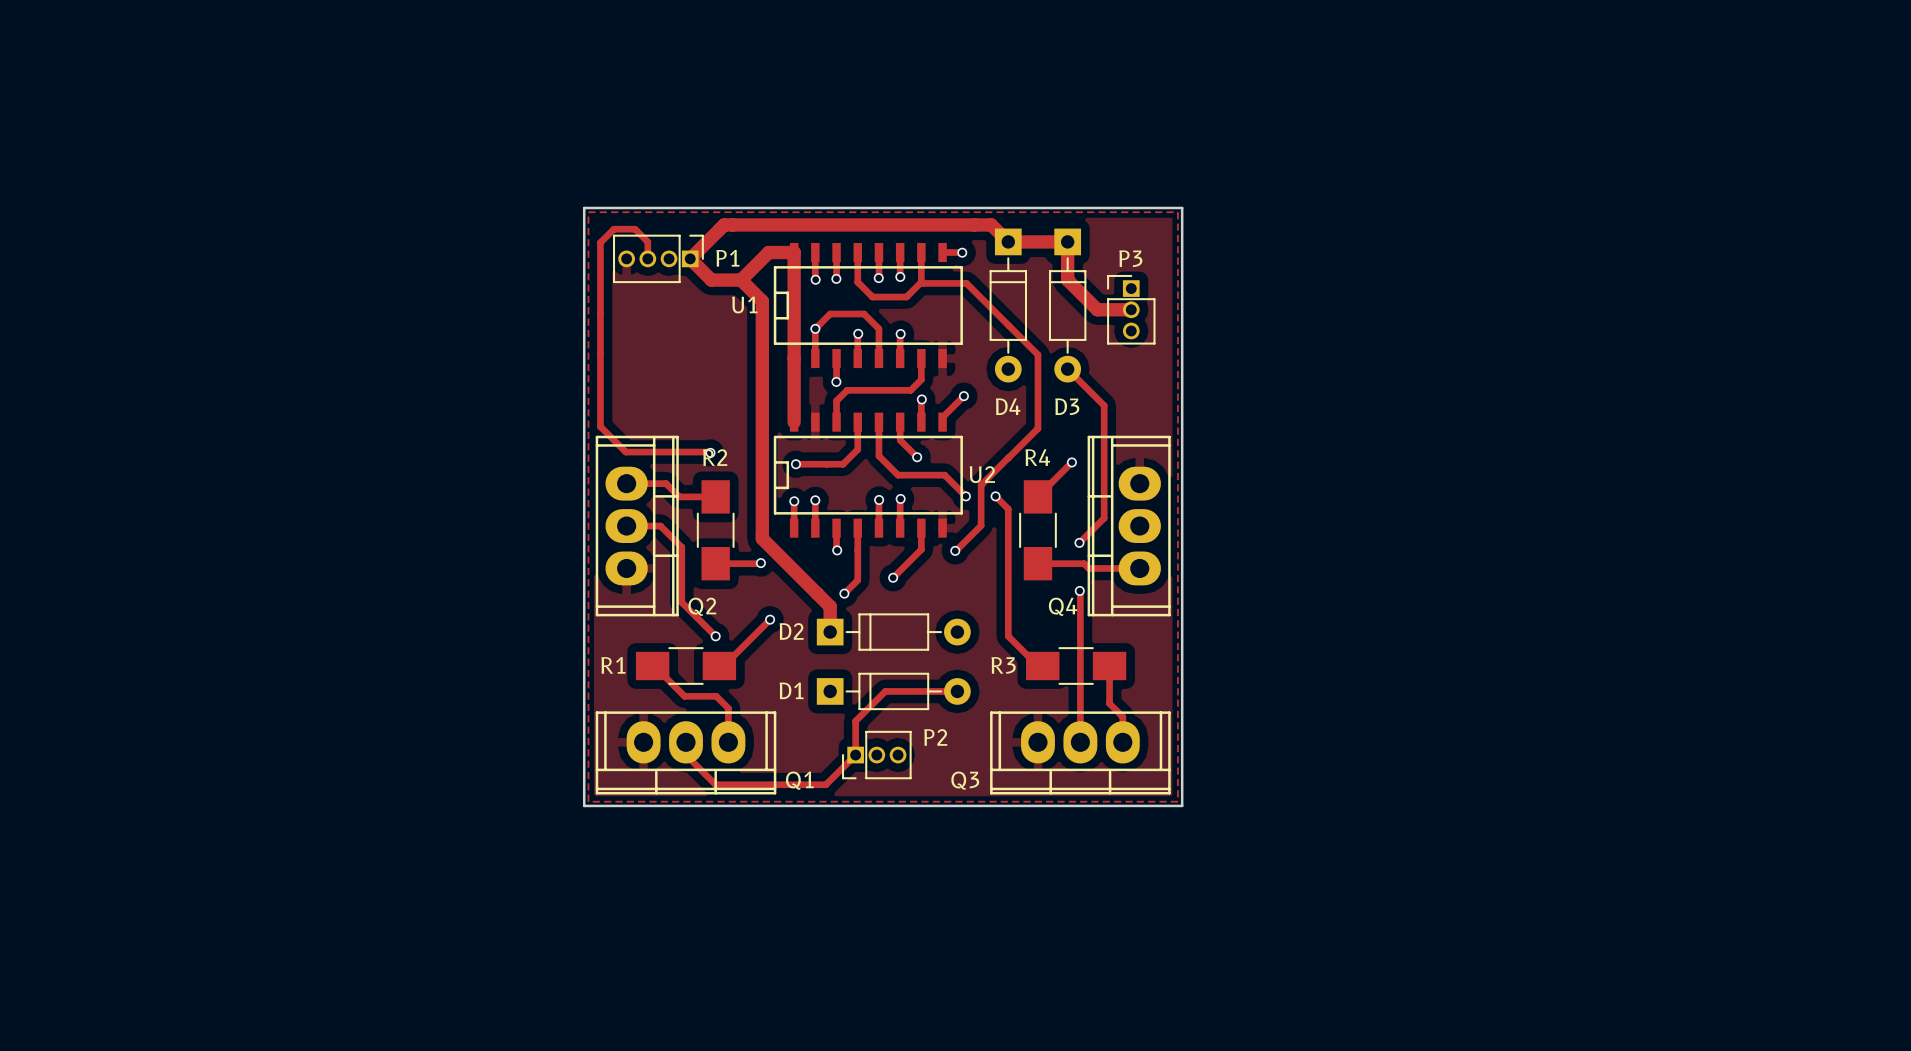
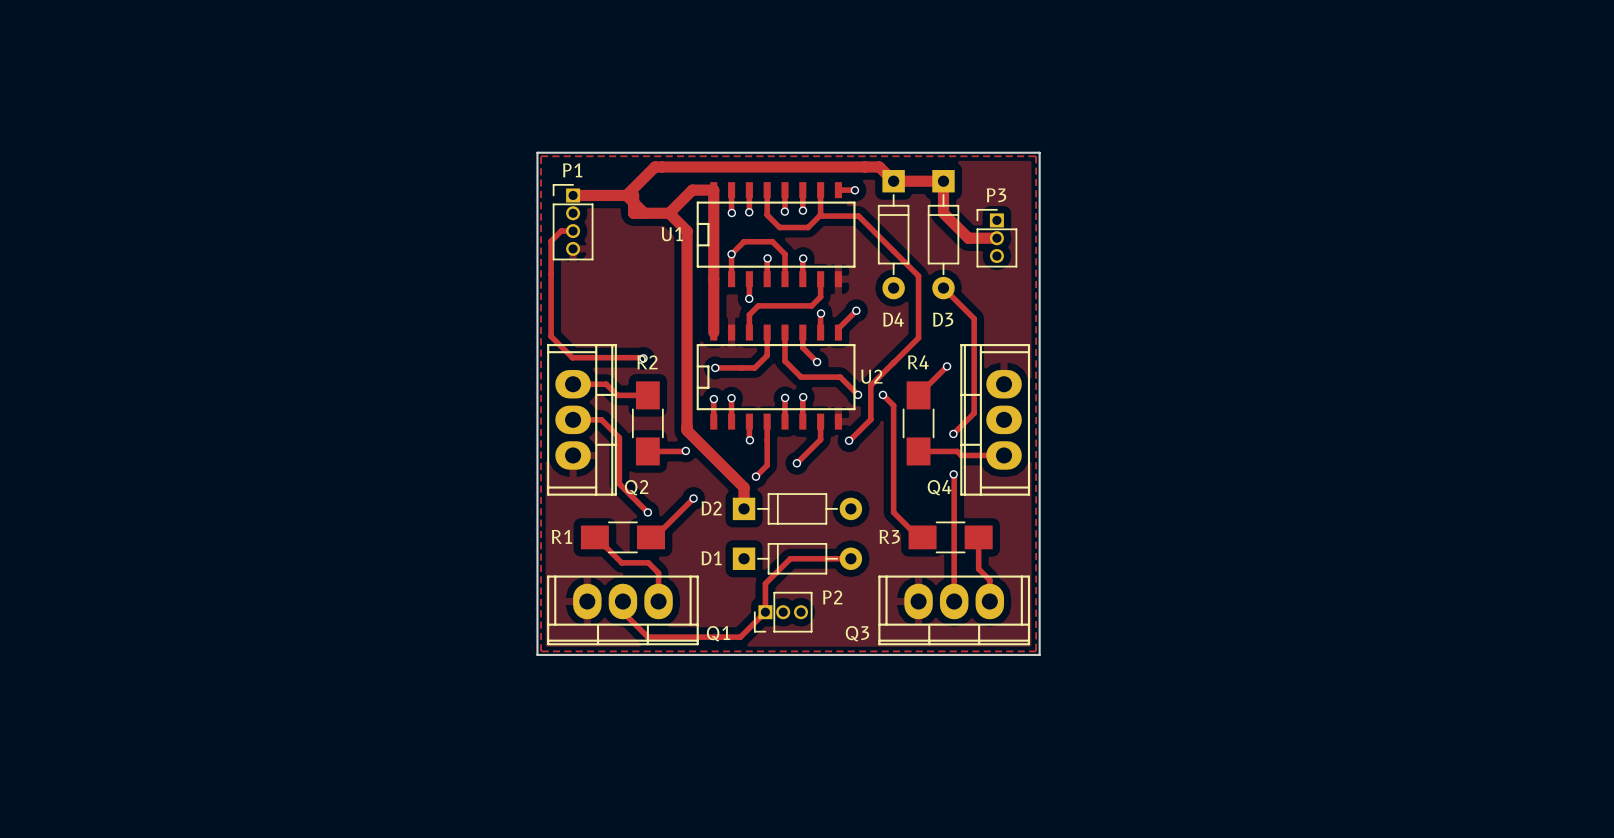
track: none -> (573, 195) (633, 195) (633, 213) (644, 213)
track: (647, 258) (647, 241) (635, 229) (613, 229) (600, 242) (600, 313) -> (573, 231) (561, 231) (551, 241)
P1 rotation: 0° (658, 258) -> 90° counterclockwise (573, 222)

